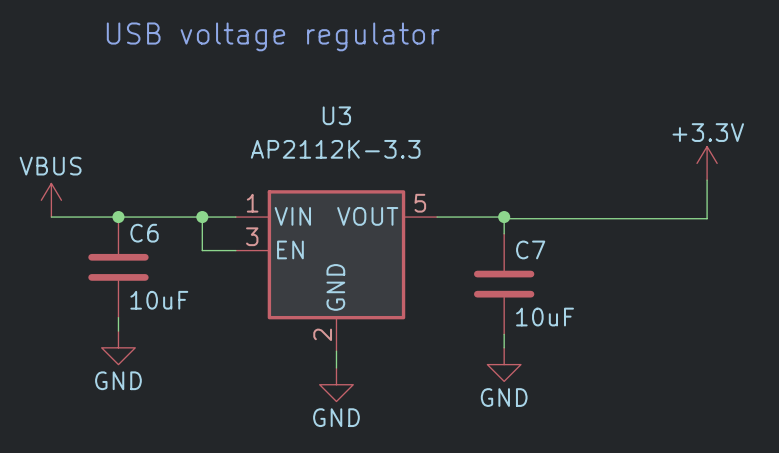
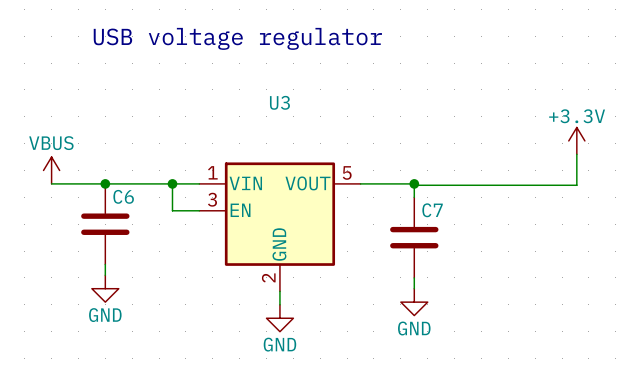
U3 value: AP2112K-3.3 (335, 149) -> none
C6 value: 10uF (159, 300) -> none
C7 value: 10uF (545, 317) -> none

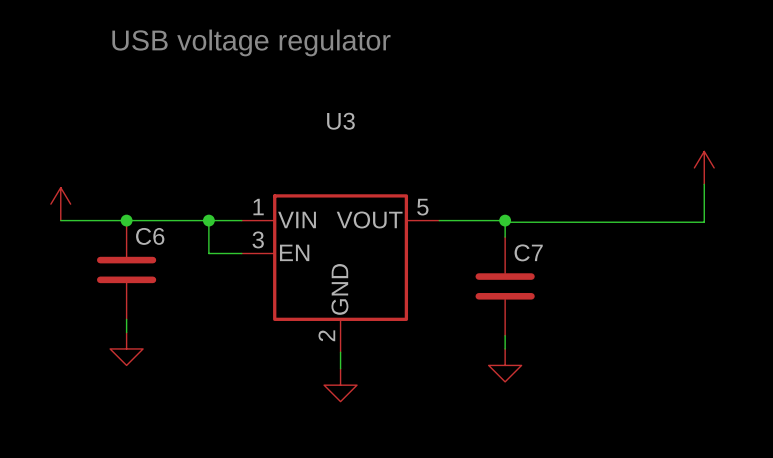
power symbol text: +3.3V (577, 116) -> none
power symbol text: VBUS (51, 143) -> none
power symbol text: GND (105, 315) -> none
power symbol text: GND (414, 328) -> none
power symbol text: GND (279, 344) -> none

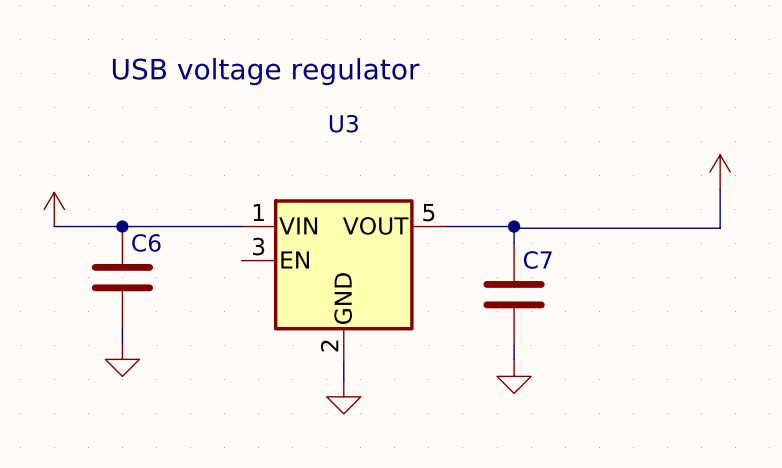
text position: USB voltage regulator (251, 42) -> USB voltage regulator (266, 71)
wire: (208, 220) (208, 253) (241, 253) -> none
junction: (208, 220) -> none

